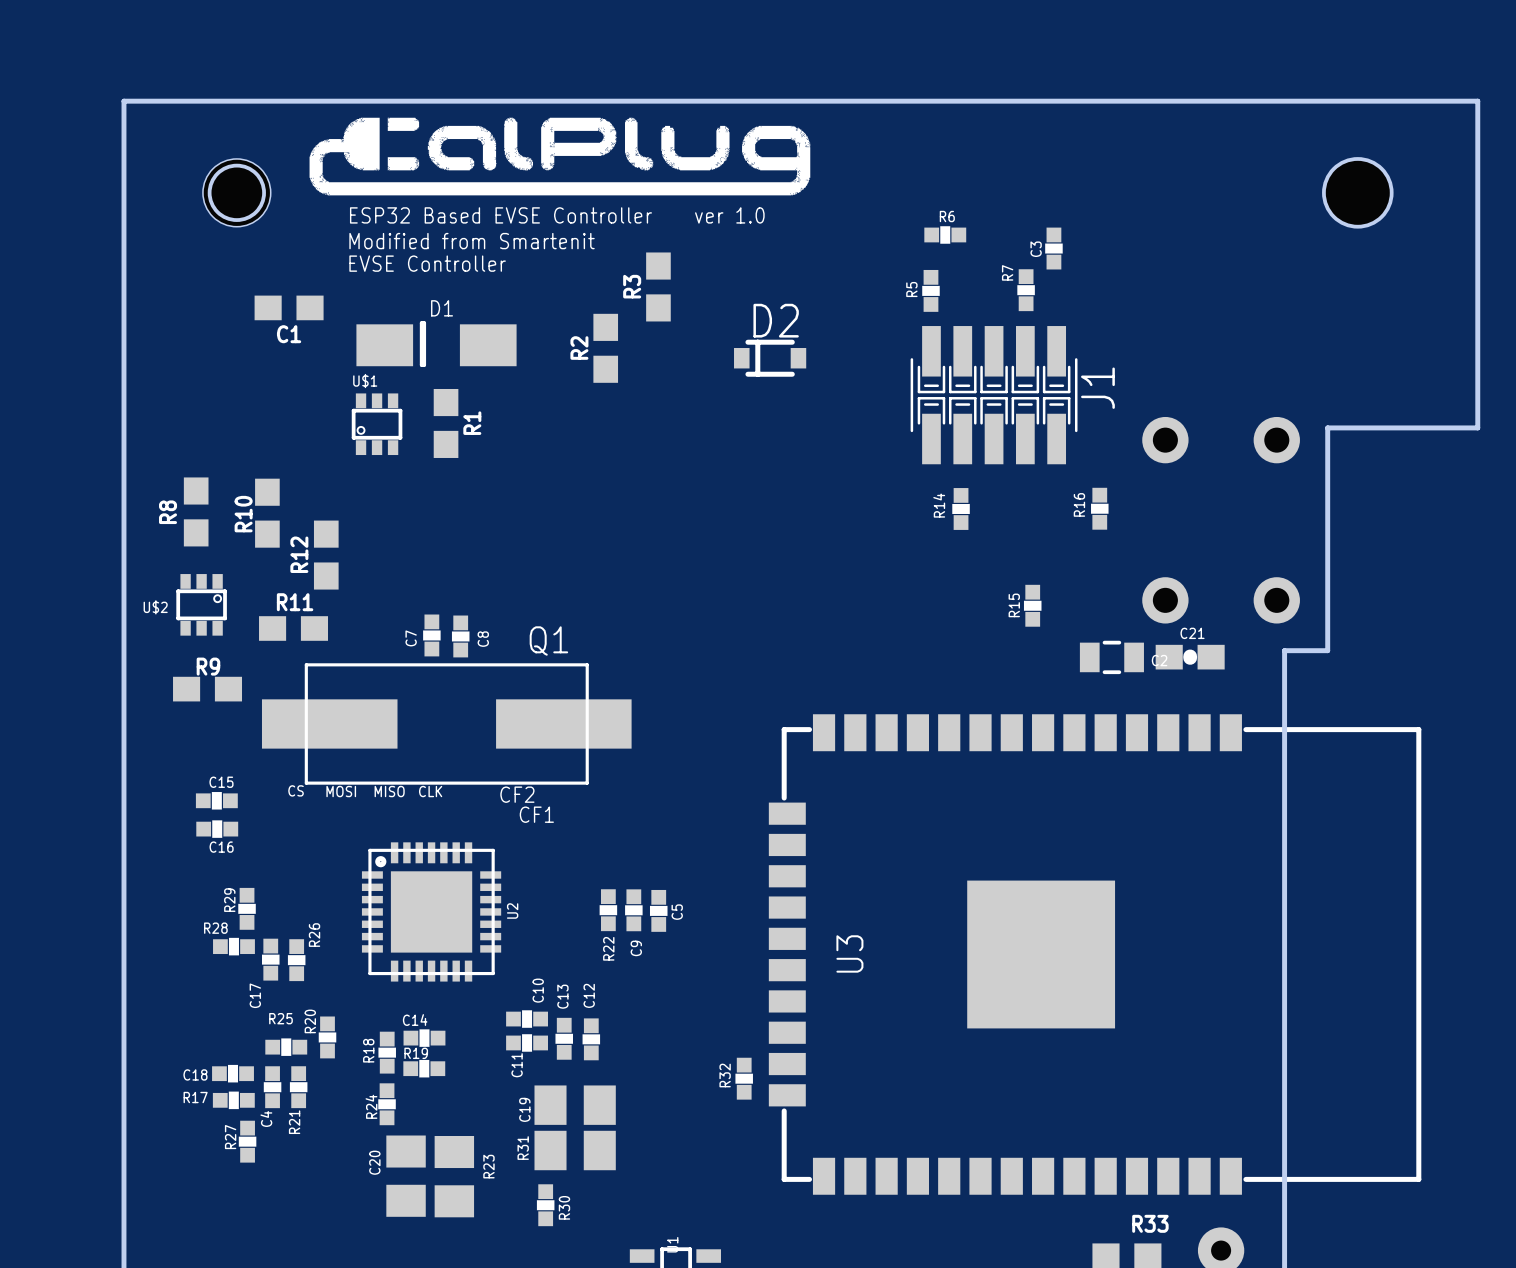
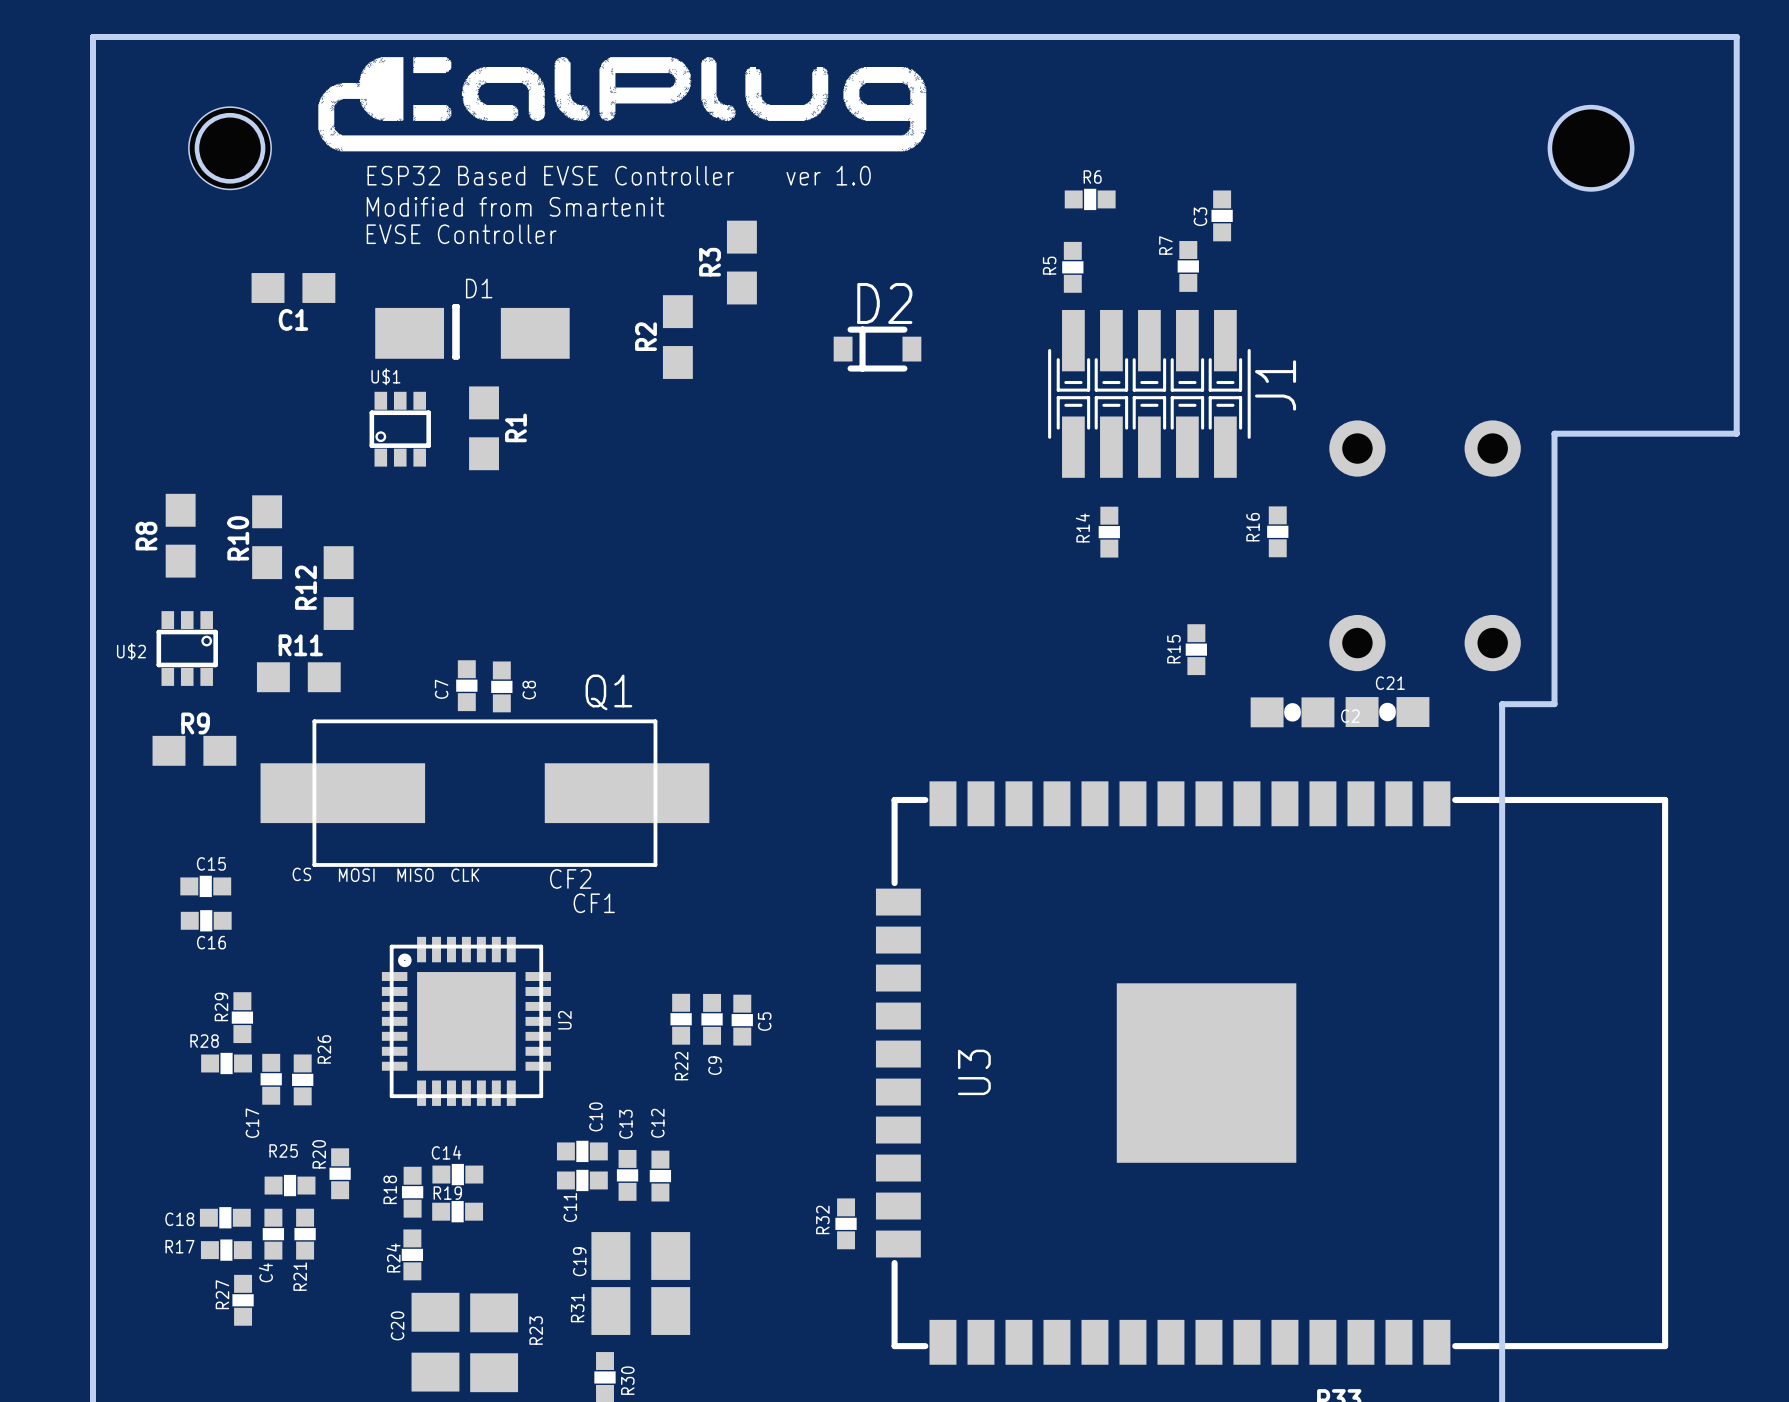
part footprint: [1079, 640, 1144, 675] -> [1250, 697, 1335, 728]

